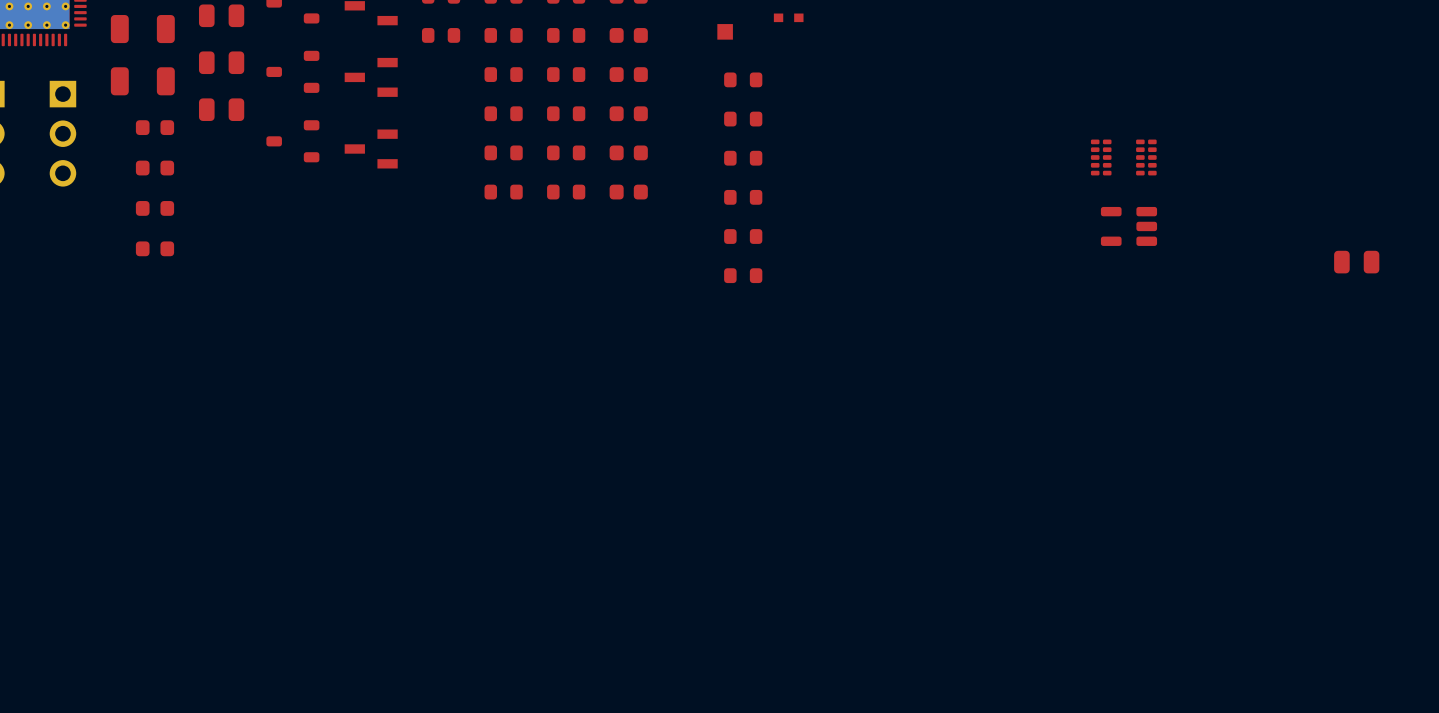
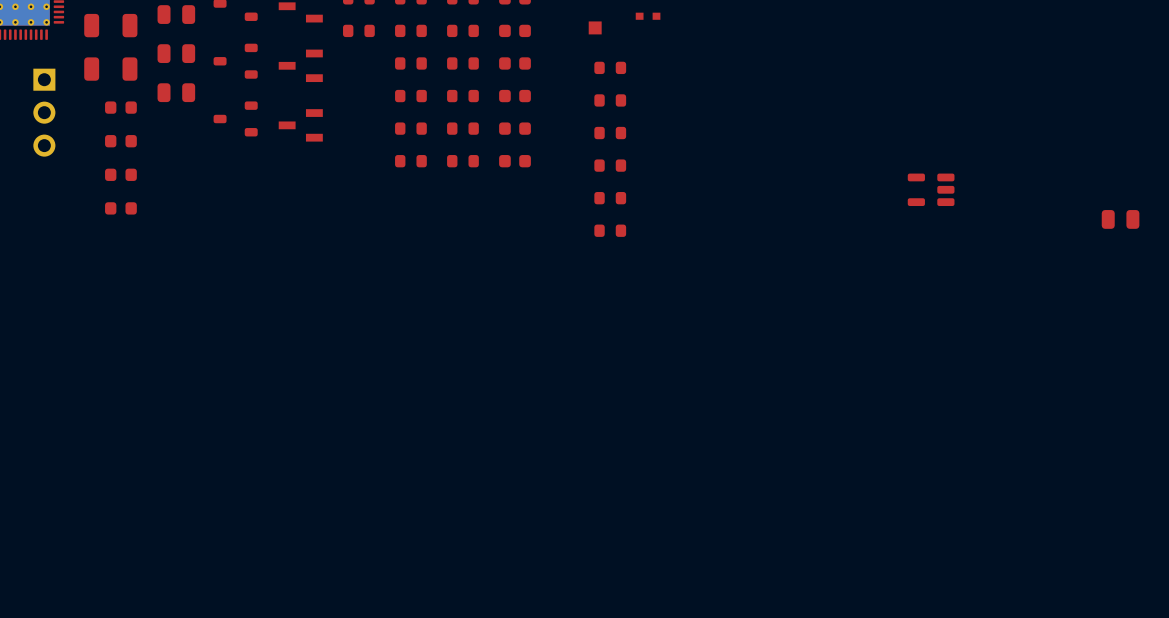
part: (1101, 157) -> none
part: (1146, 157) -> none

